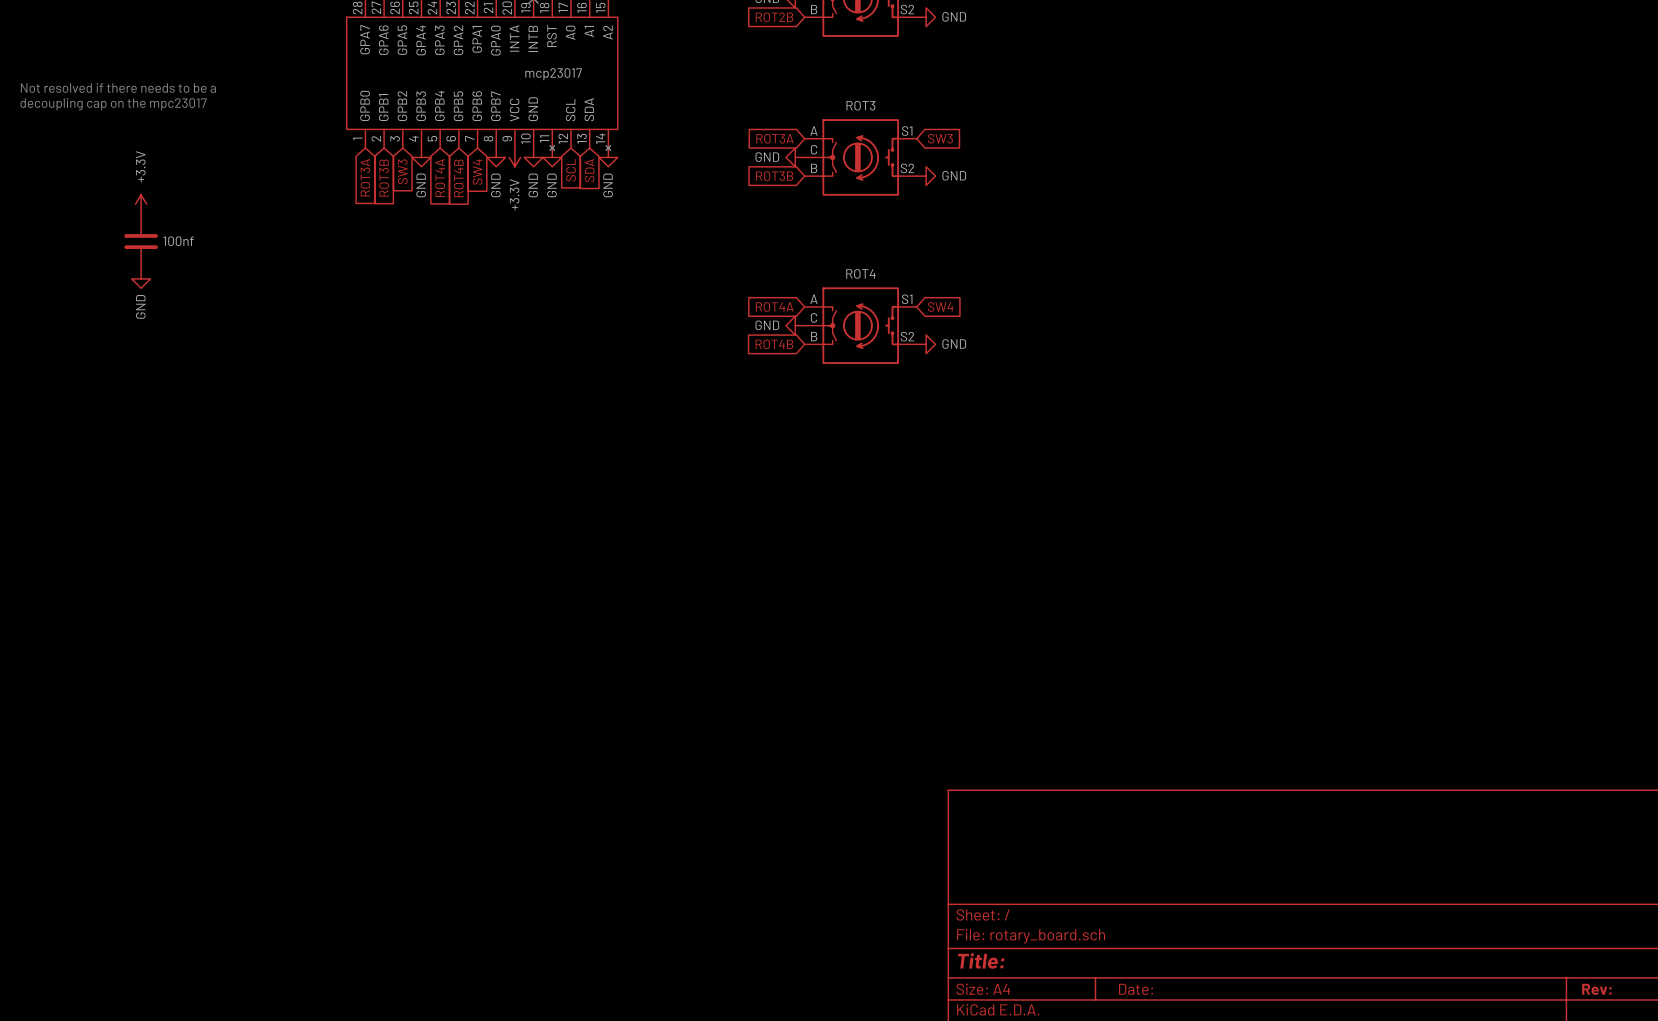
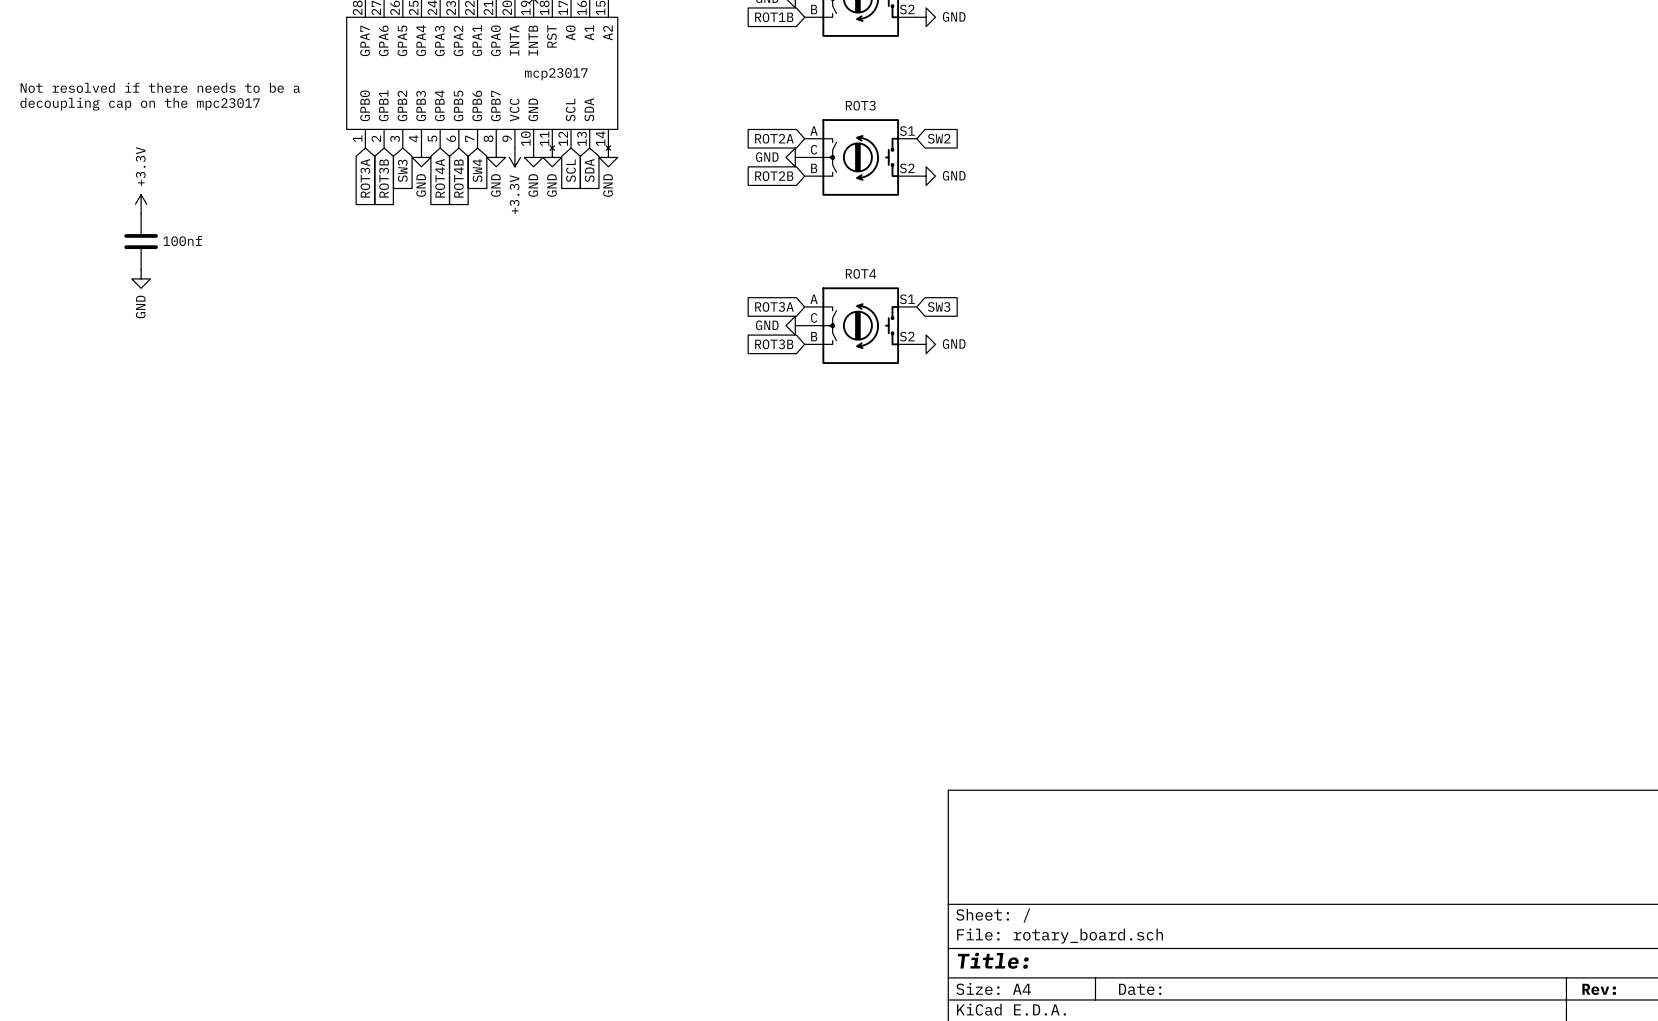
global label: ROT2B (774, 17) -> ROT1B (774, 17)
global label: ROT3A (775, 138) -> ROT2A (774, 138)
global label: SW3 (940, 138) -> SW2 (939, 138)
global label: ROT3B (774, 176) -> ROT2B (774, 176)
global label: ROT4A (774, 306) -> ROT3A (774, 306)
global label: SW4 (940, 306) -> SW3 (939, 306)
global label: ROT4B (774, 344) -> ROT3B (774, 344)

